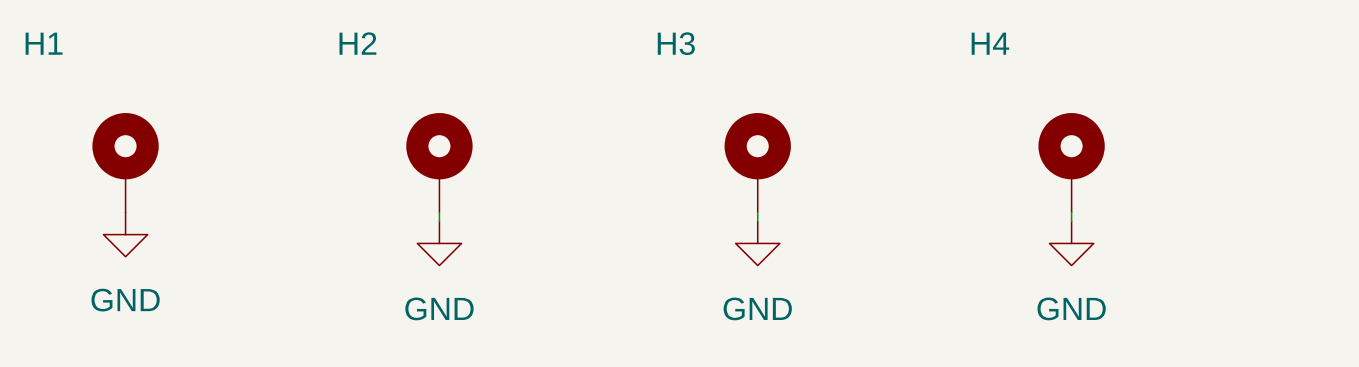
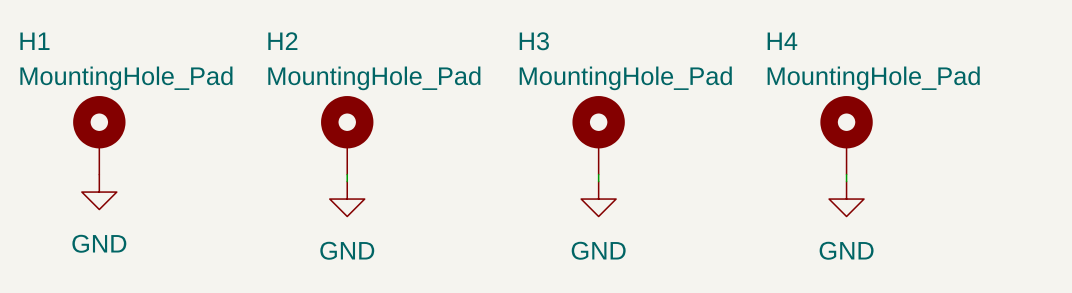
H1 value: none -> MountingHole_Pad (126, 78)
H2 value: none -> MountingHole_Pad (374, 78)
H3 value: none -> MountingHole_Pad (625, 78)
H4 value: none -> MountingHole_Pad (873, 78)

